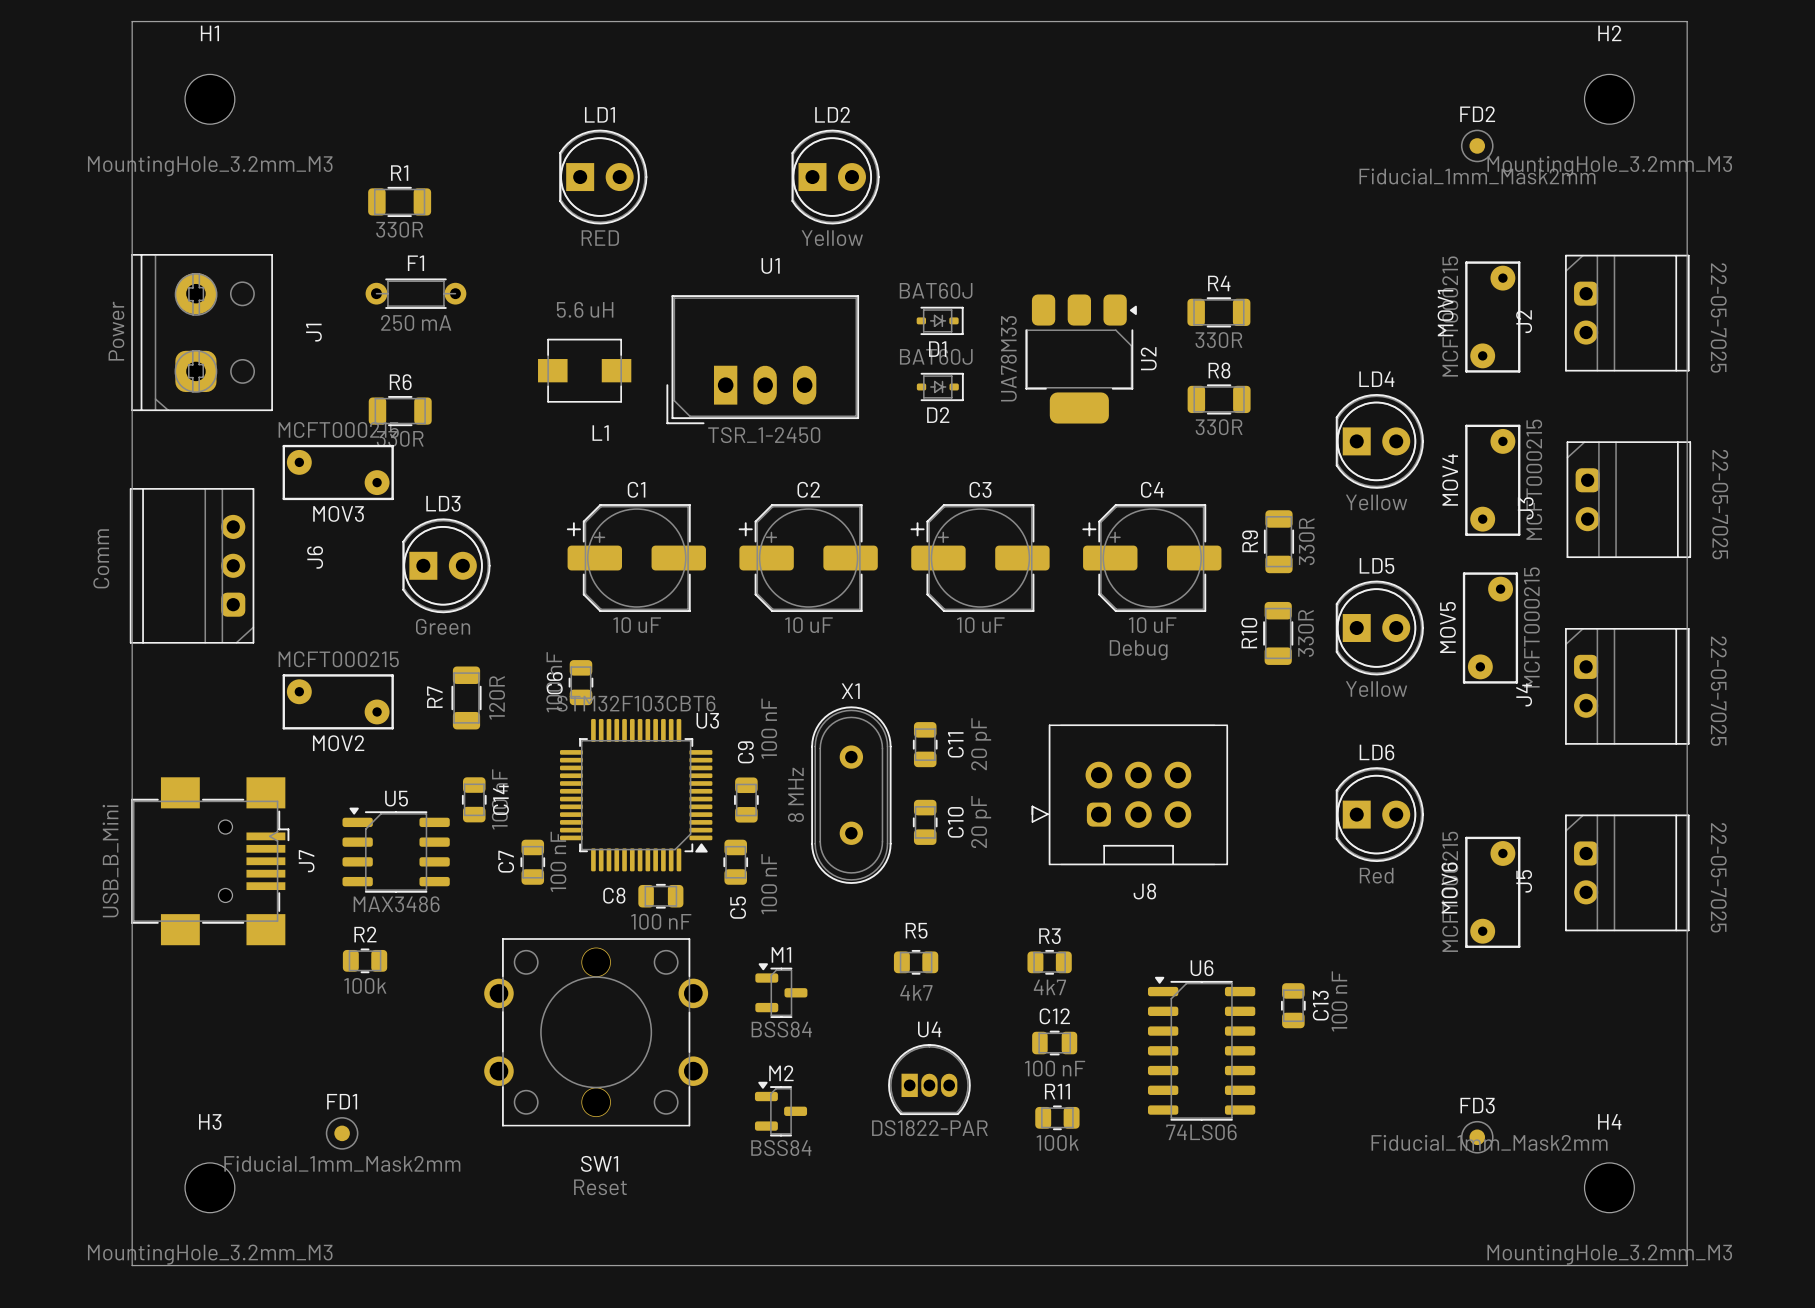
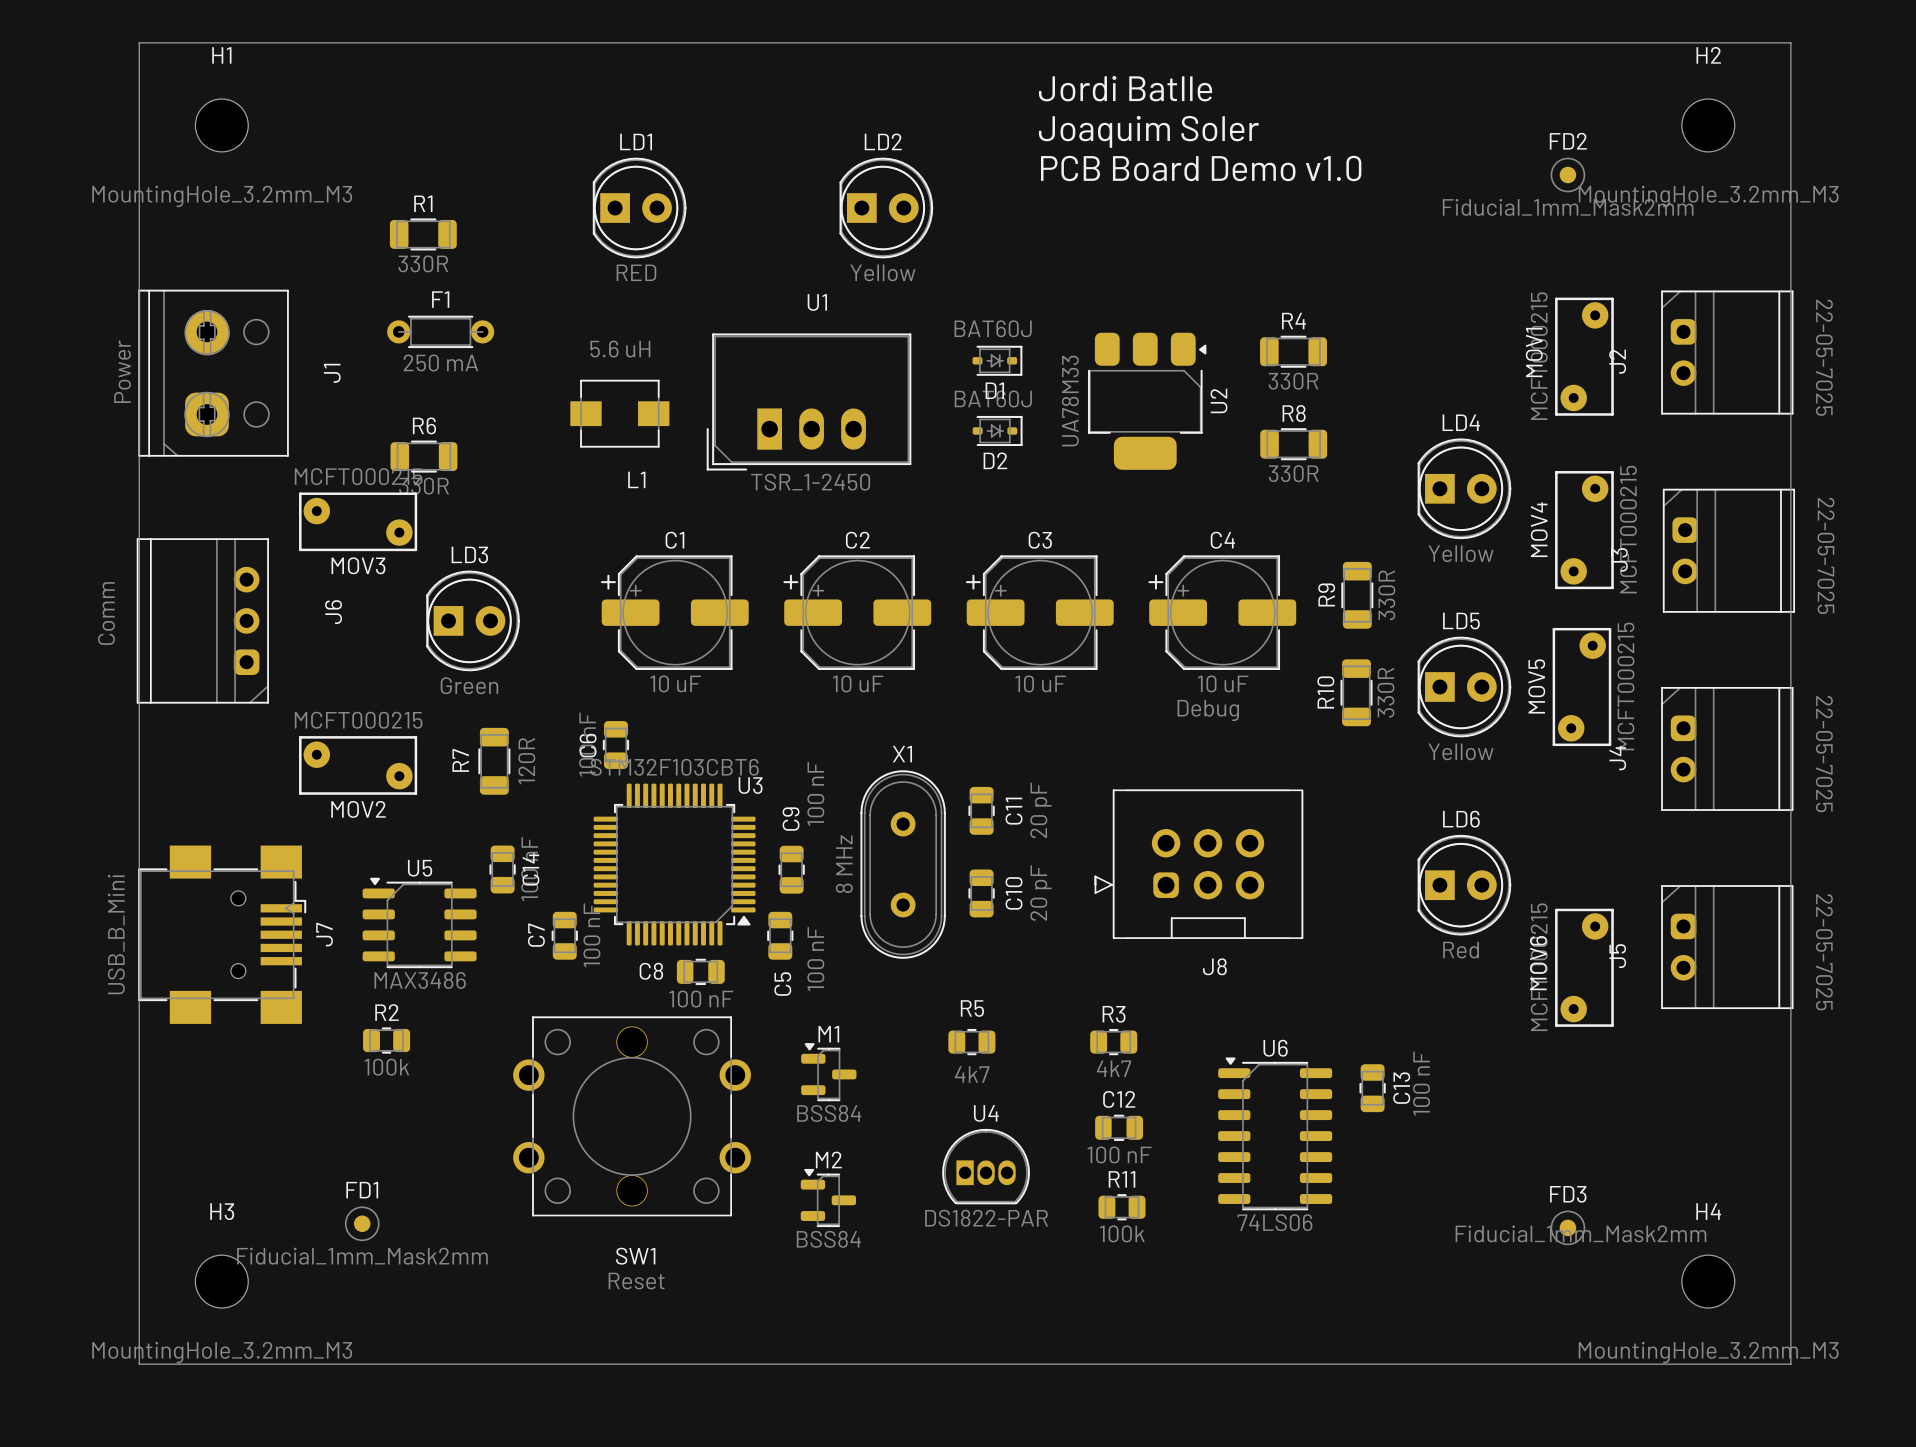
text: none -> Jordi Batlle (1125, 88)
text: none -> Joaquim Soler (1148, 131)
text: none -> PCB Board Demo v1.0 (1201, 168)

